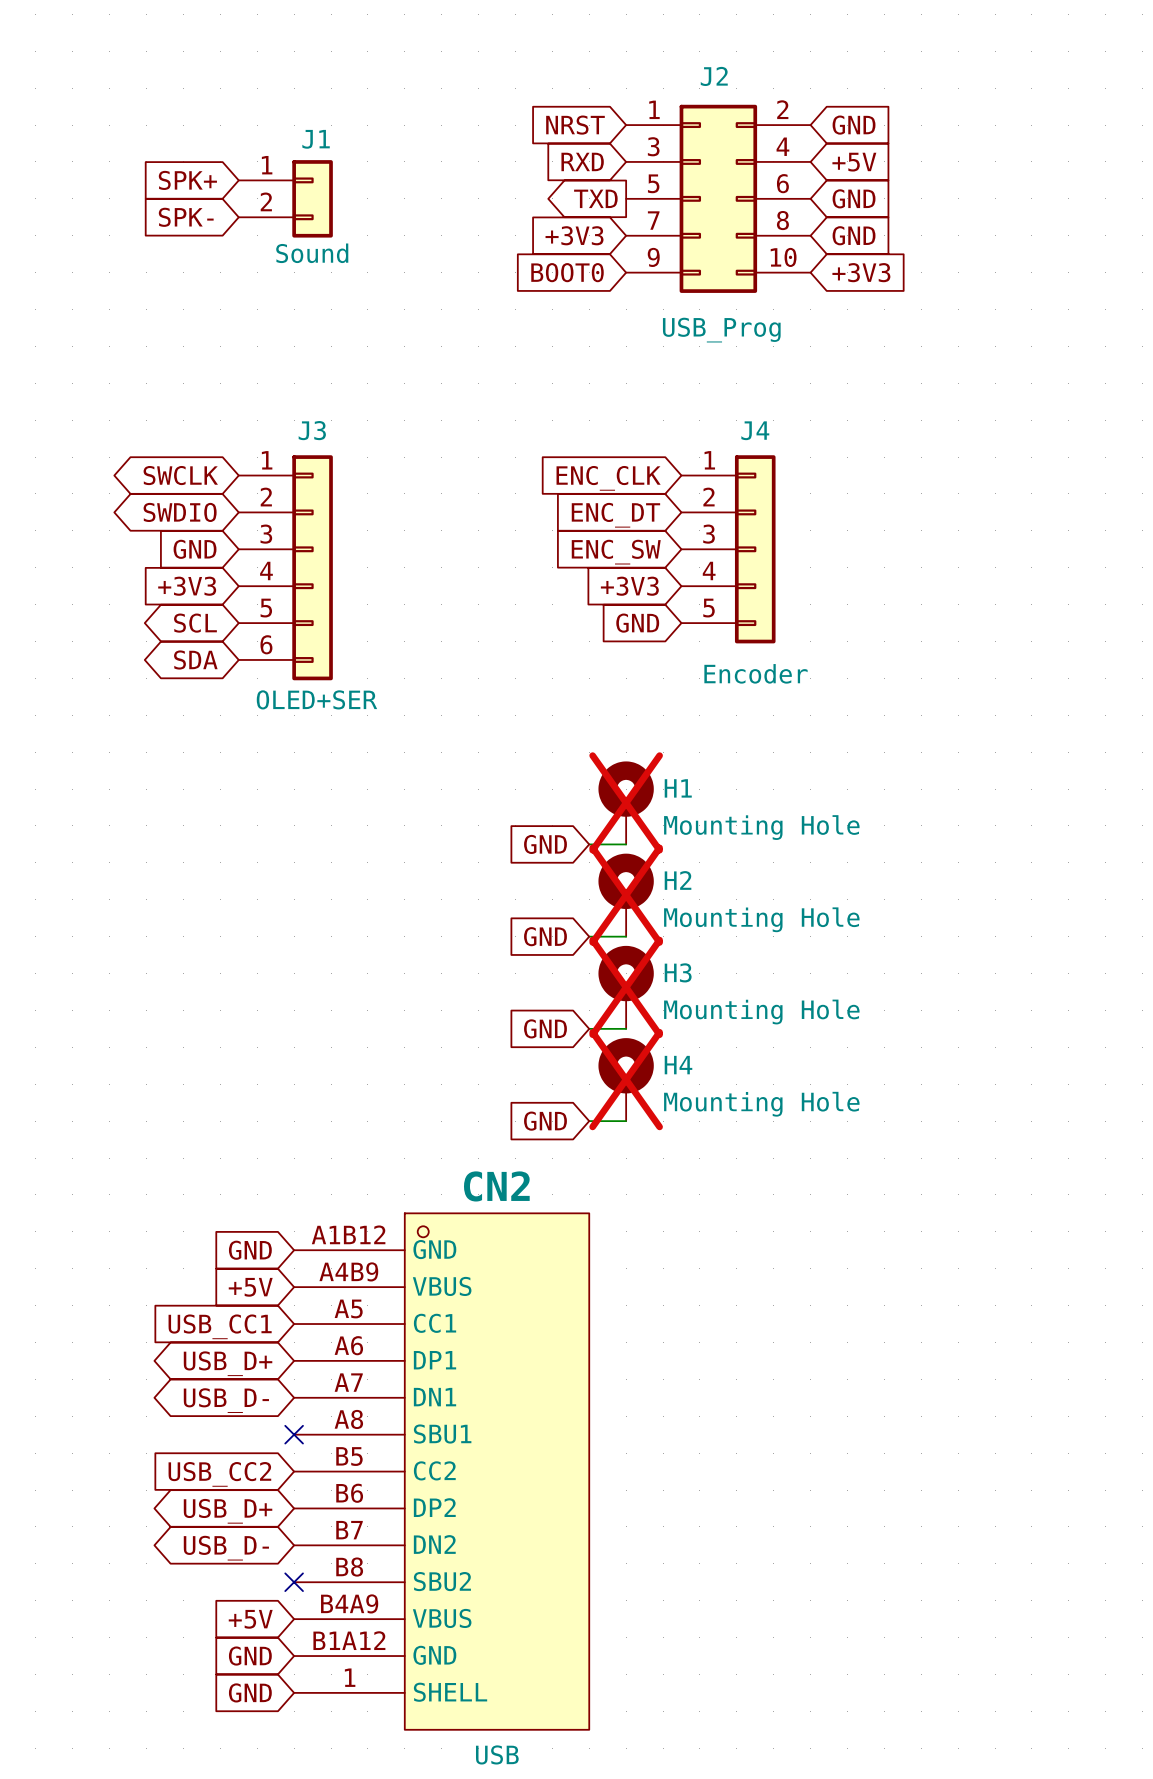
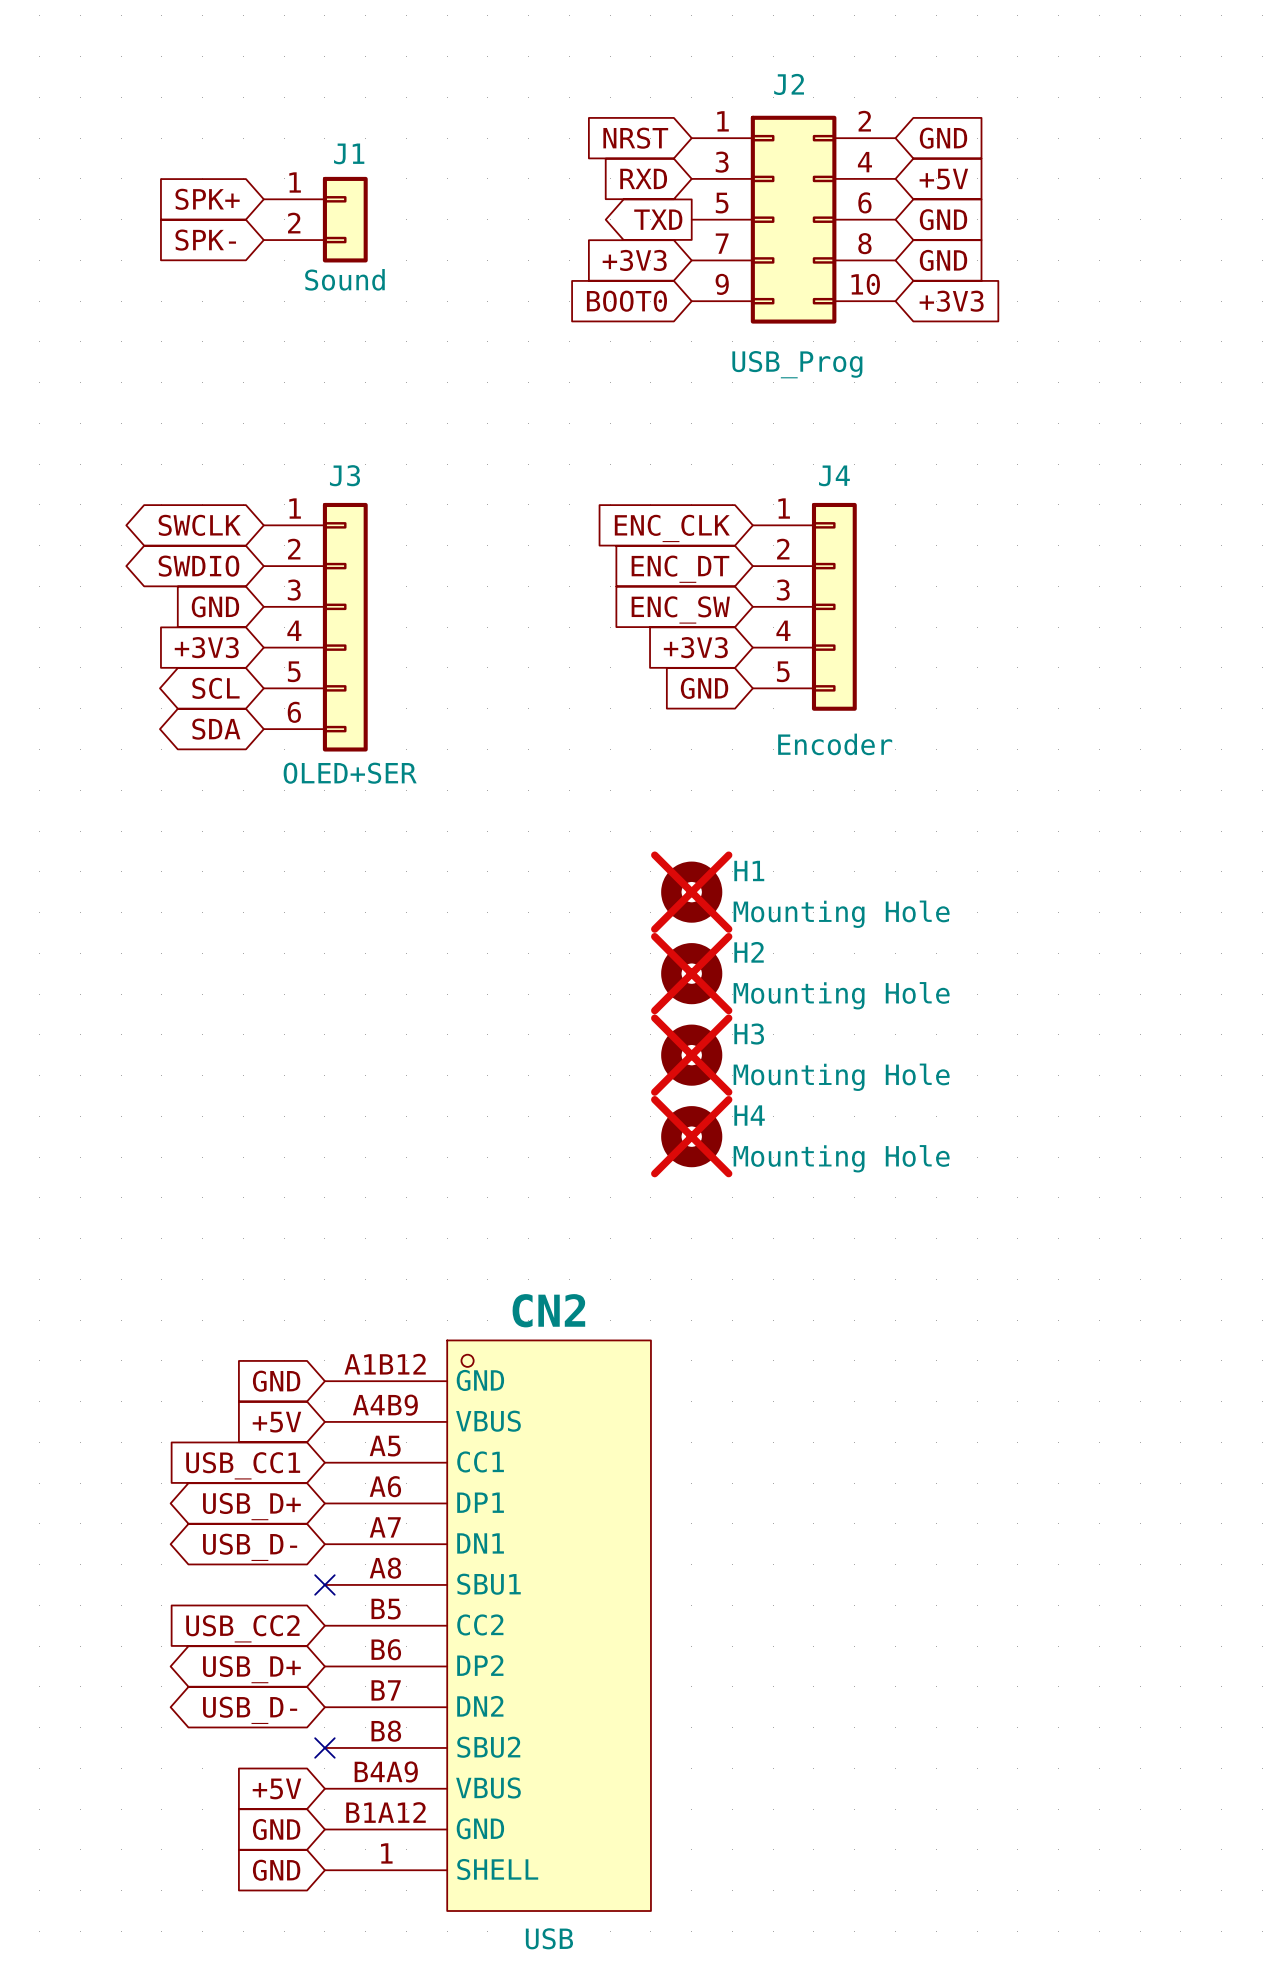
H1 symbol: [598, 761, 654, 845] -> [661, 861, 723, 923]
global label: GND (545, 844) -> none
wire: (589, 844) (626, 844) -> none
H2 symbol: [598, 853, 654, 937] -> [661, 943, 723, 1005]
global label: GND (545, 936) -> none
H3 symbol: [598, 945, 654, 1029] -> [661, 1024, 723, 1086]
global label: GND (545, 1028) -> none
H4 symbol: [598, 1038, 654, 1122] -> [661, 1106, 723, 1168]
global label: GND (545, 1121) -> none
wire: (589, 1121) (626, 1121) -> none

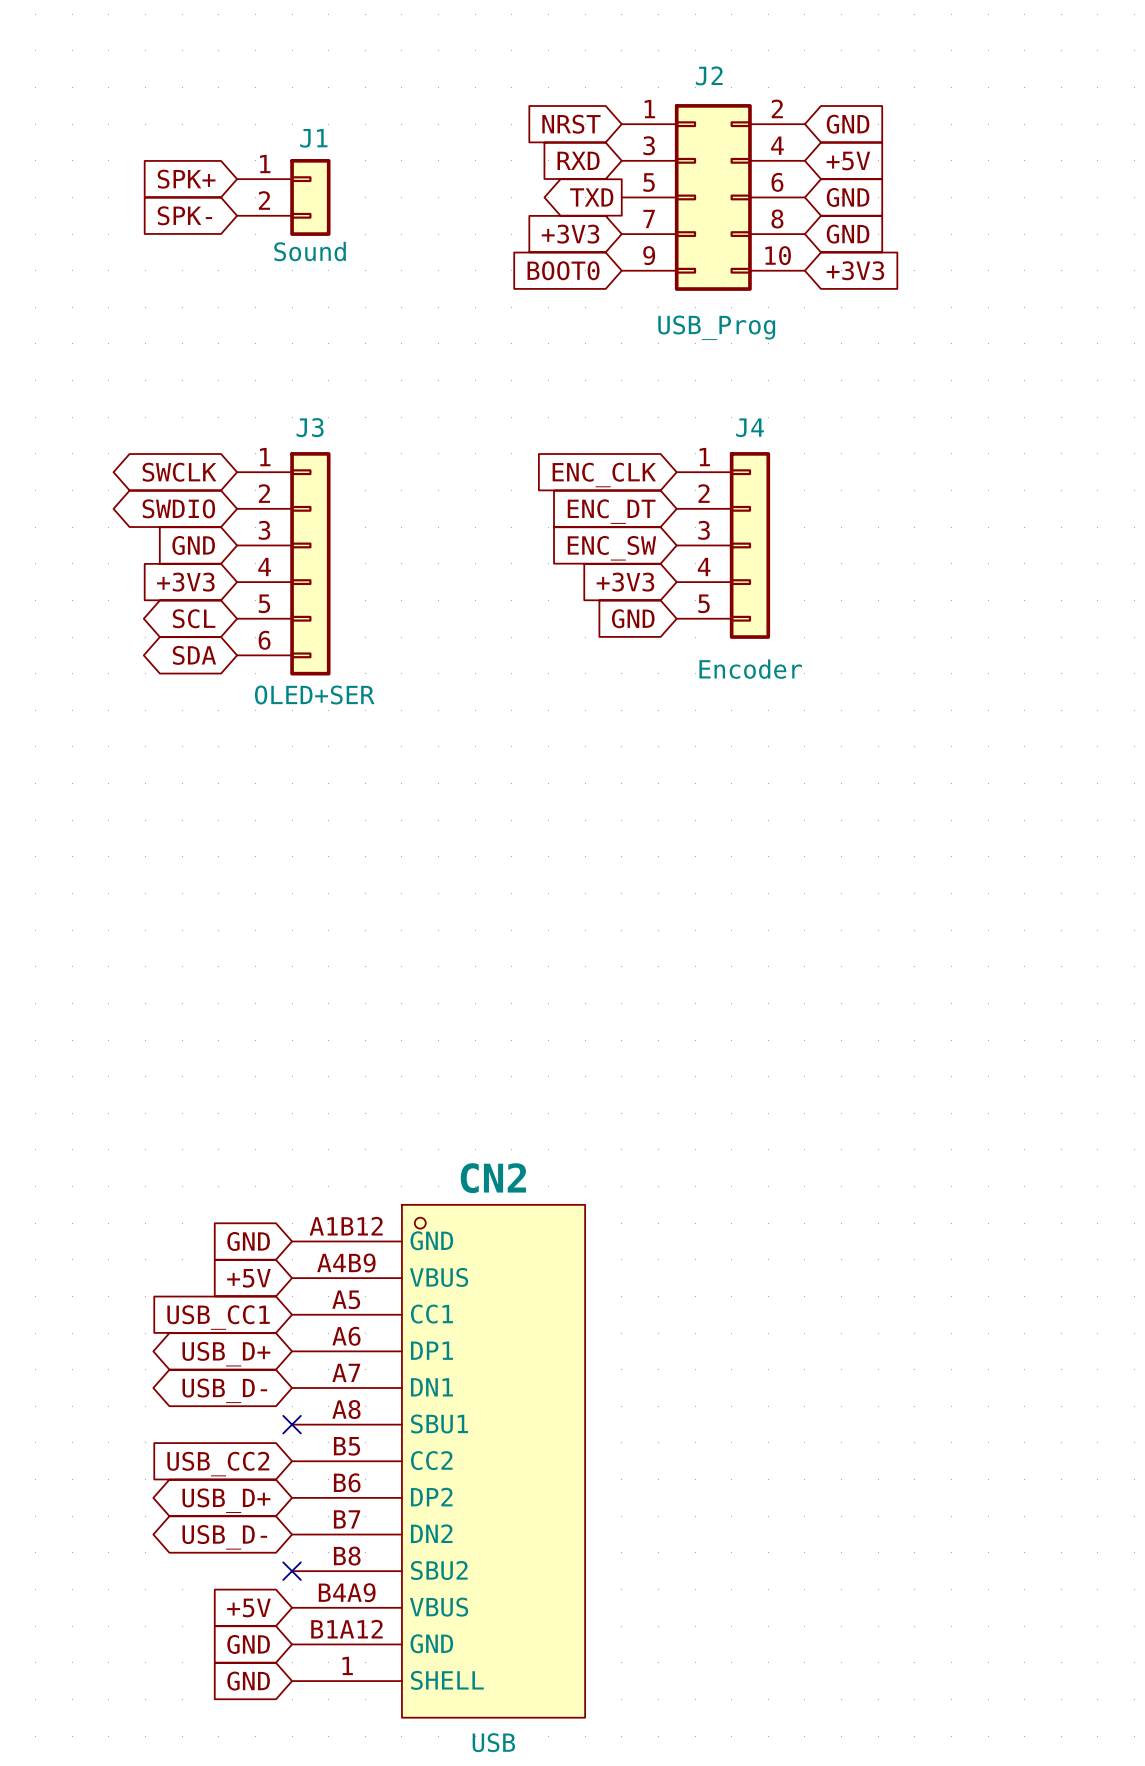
H1: Mounting Hole (691, 892) -> none
H2: Mounting Hole (691, 973) -> none
H3: Mounting Hole (691, 1055) -> none
H4: Mounting Hole (691, 1136) -> none

